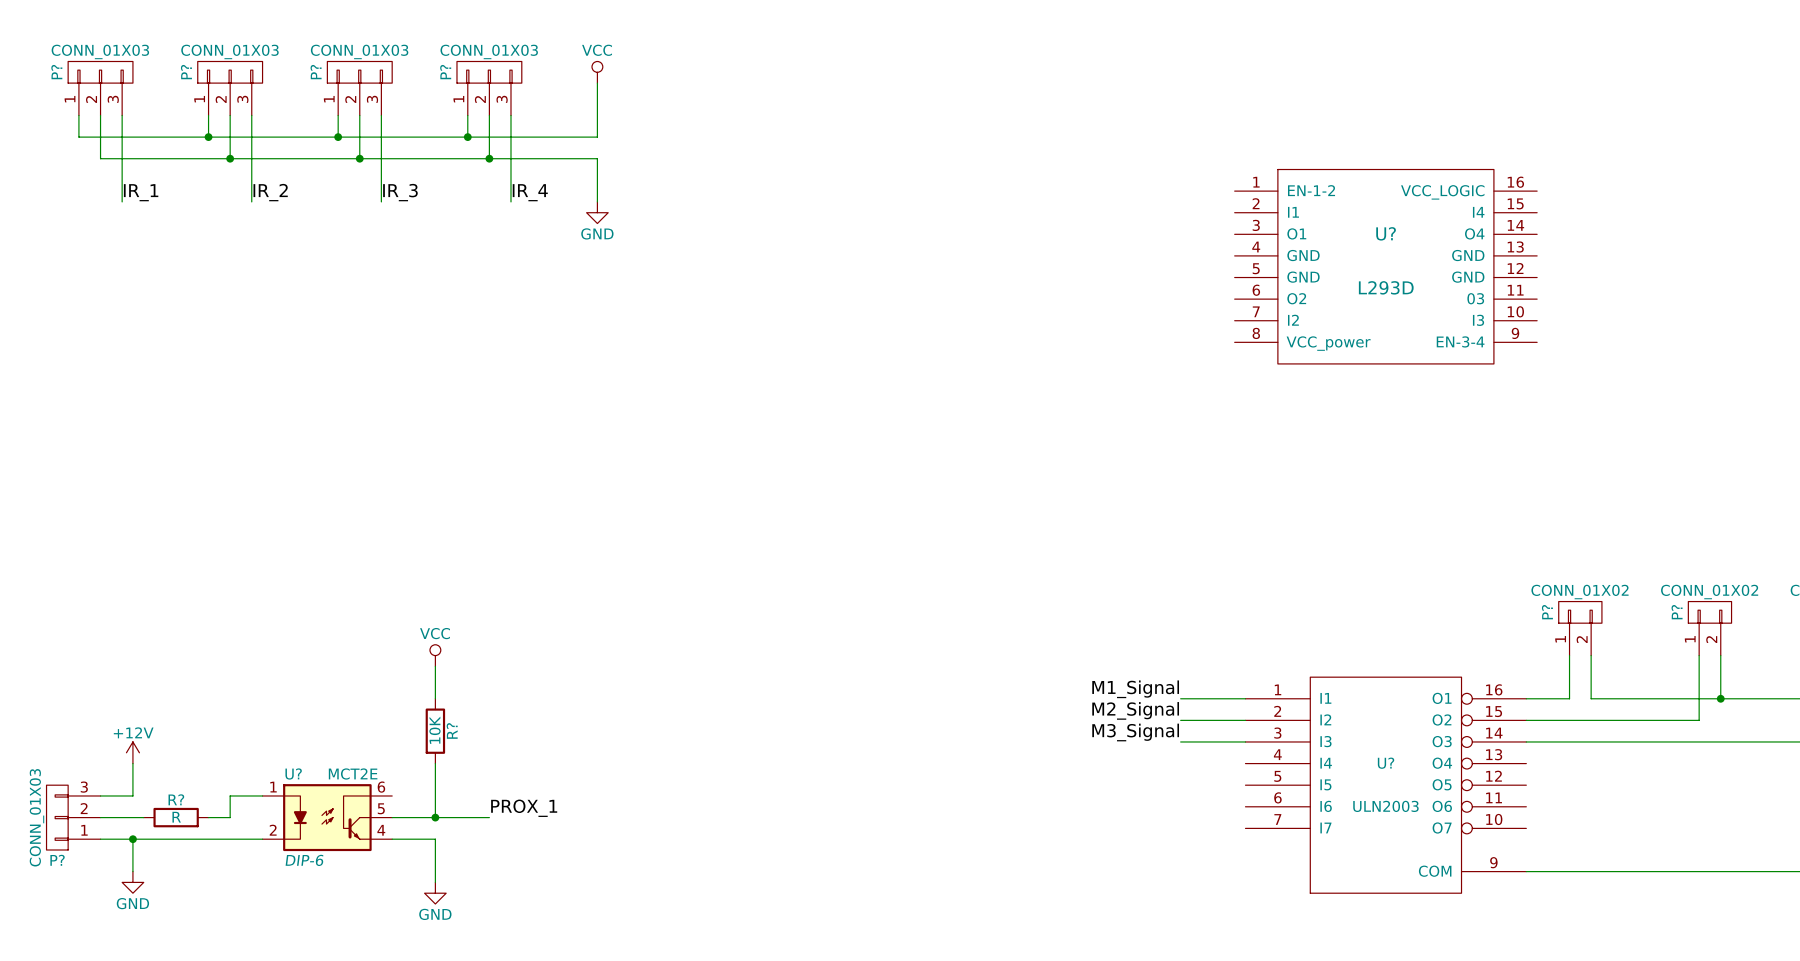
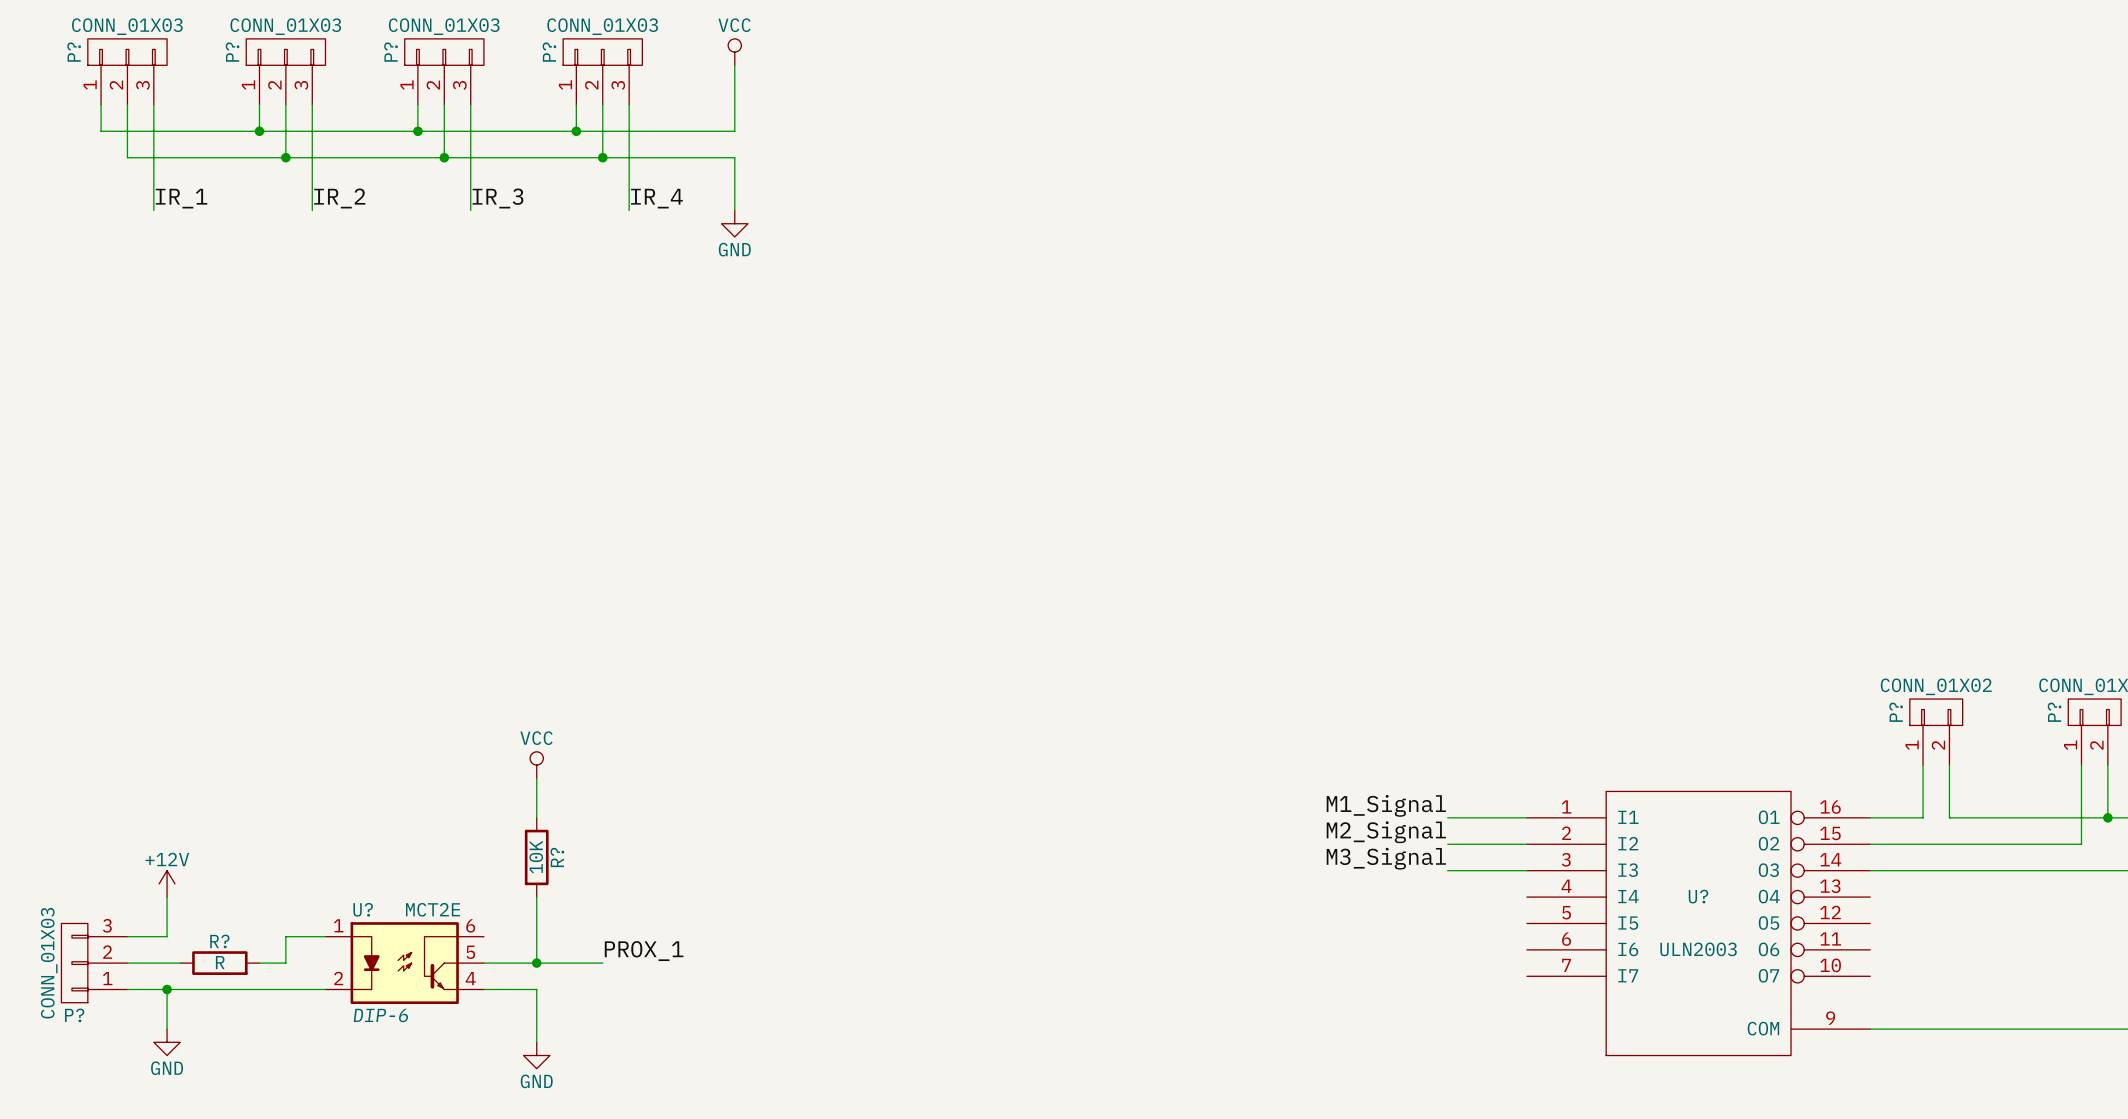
U?: L293D (1385, 266) -> none

